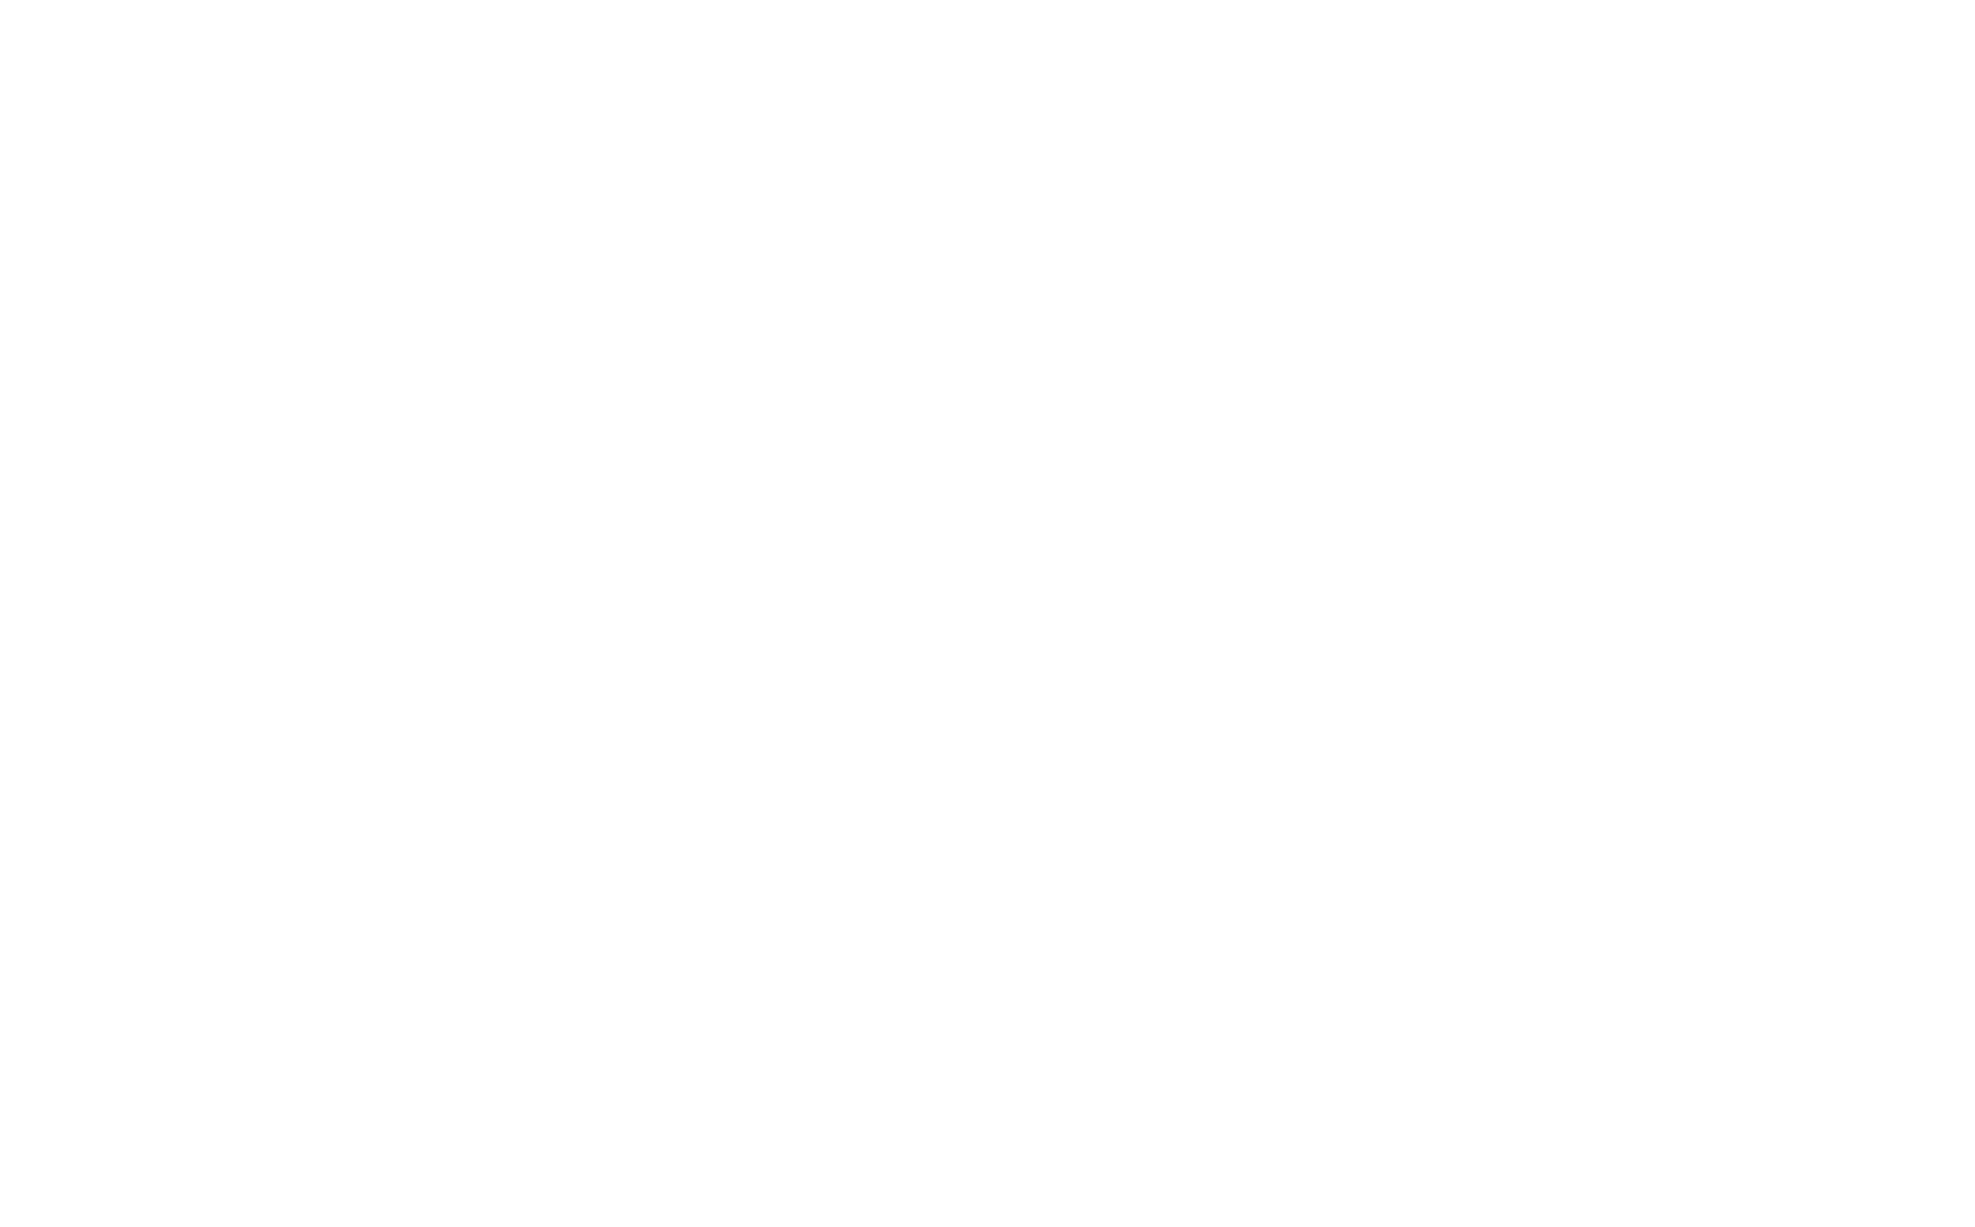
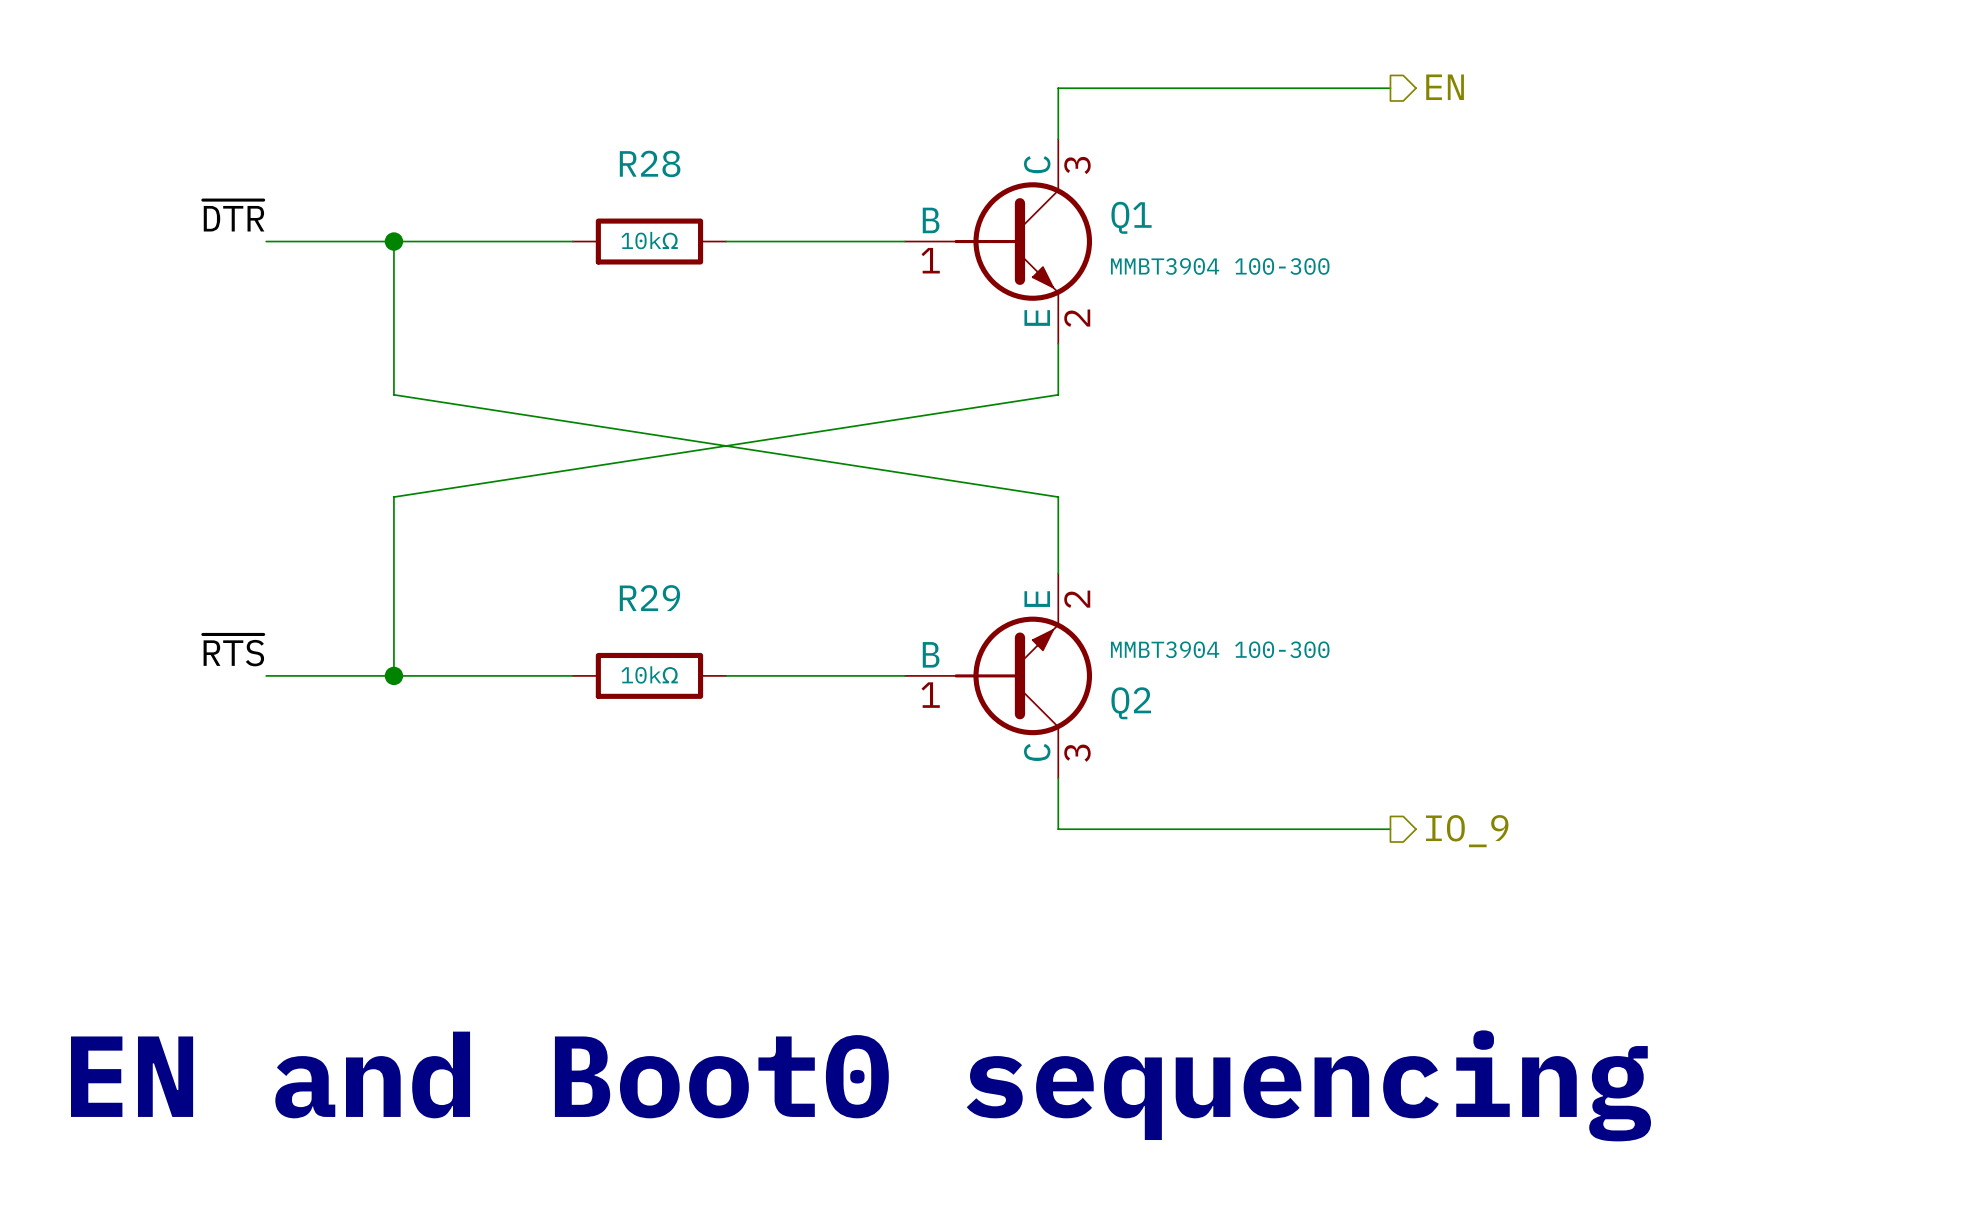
hierarchical label: none -> EN (1445, 87)
wire: none -> (1390, 88) (1058, 88) (1058, 139)
label: none -> ~{DTR} (233, 215)
wire: none -> (266, 241) (572, 241)
wire: none -> (393, 241) (393, 394) (1058, 497) (1058, 573)
junction: none -> (393, 241)
R28: none -> 10kΩ (649, 241)
wire: none -> (726, 241) (904, 241)
Q1: none -> MMBT3904 100-300 (998, 241)
wire: none -> (1058, 343) (1058, 394) (393, 497) (393, 675)
label: none -> ~{RTS} (233, 650)
wire: none -> (266, 675) (572, 675)
junction: none -> (393, 675)
R29: none -> 10kΩ (649, 675)
wire: none -> (726, 675) (904, 675)
Q2: none -> MMBT3904 100-300 (998, 675)
wire: none -> (1058, 778) (1058, 829) (1390, 829)
hierarchical label: none -> IO_9 (1467, 831)
text: none -> EN and Boot0 sequencing (861, 1085)

